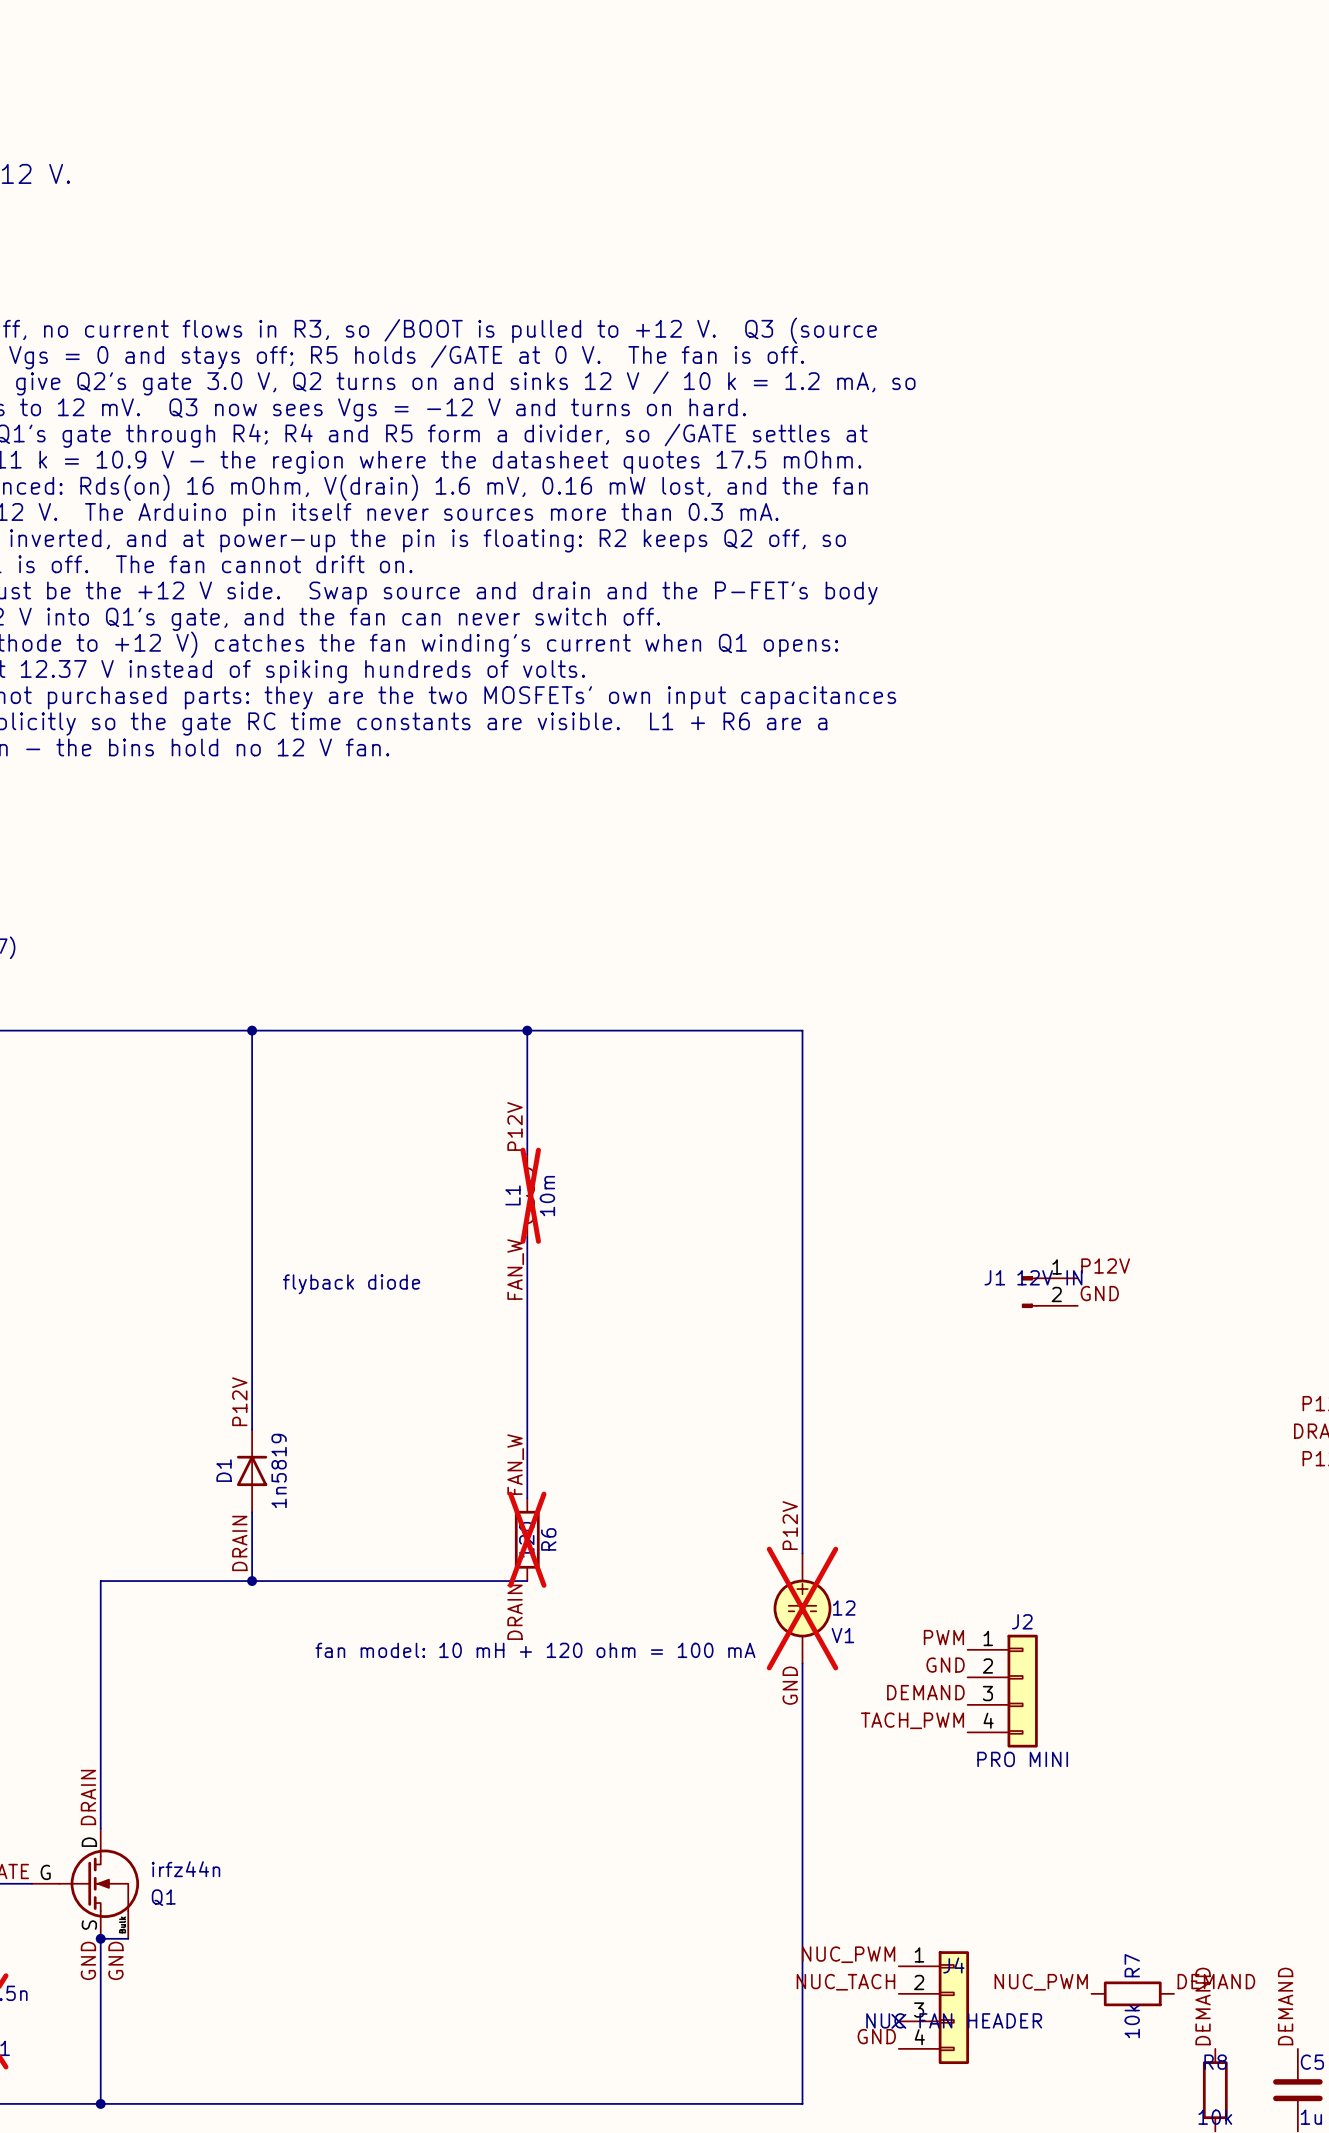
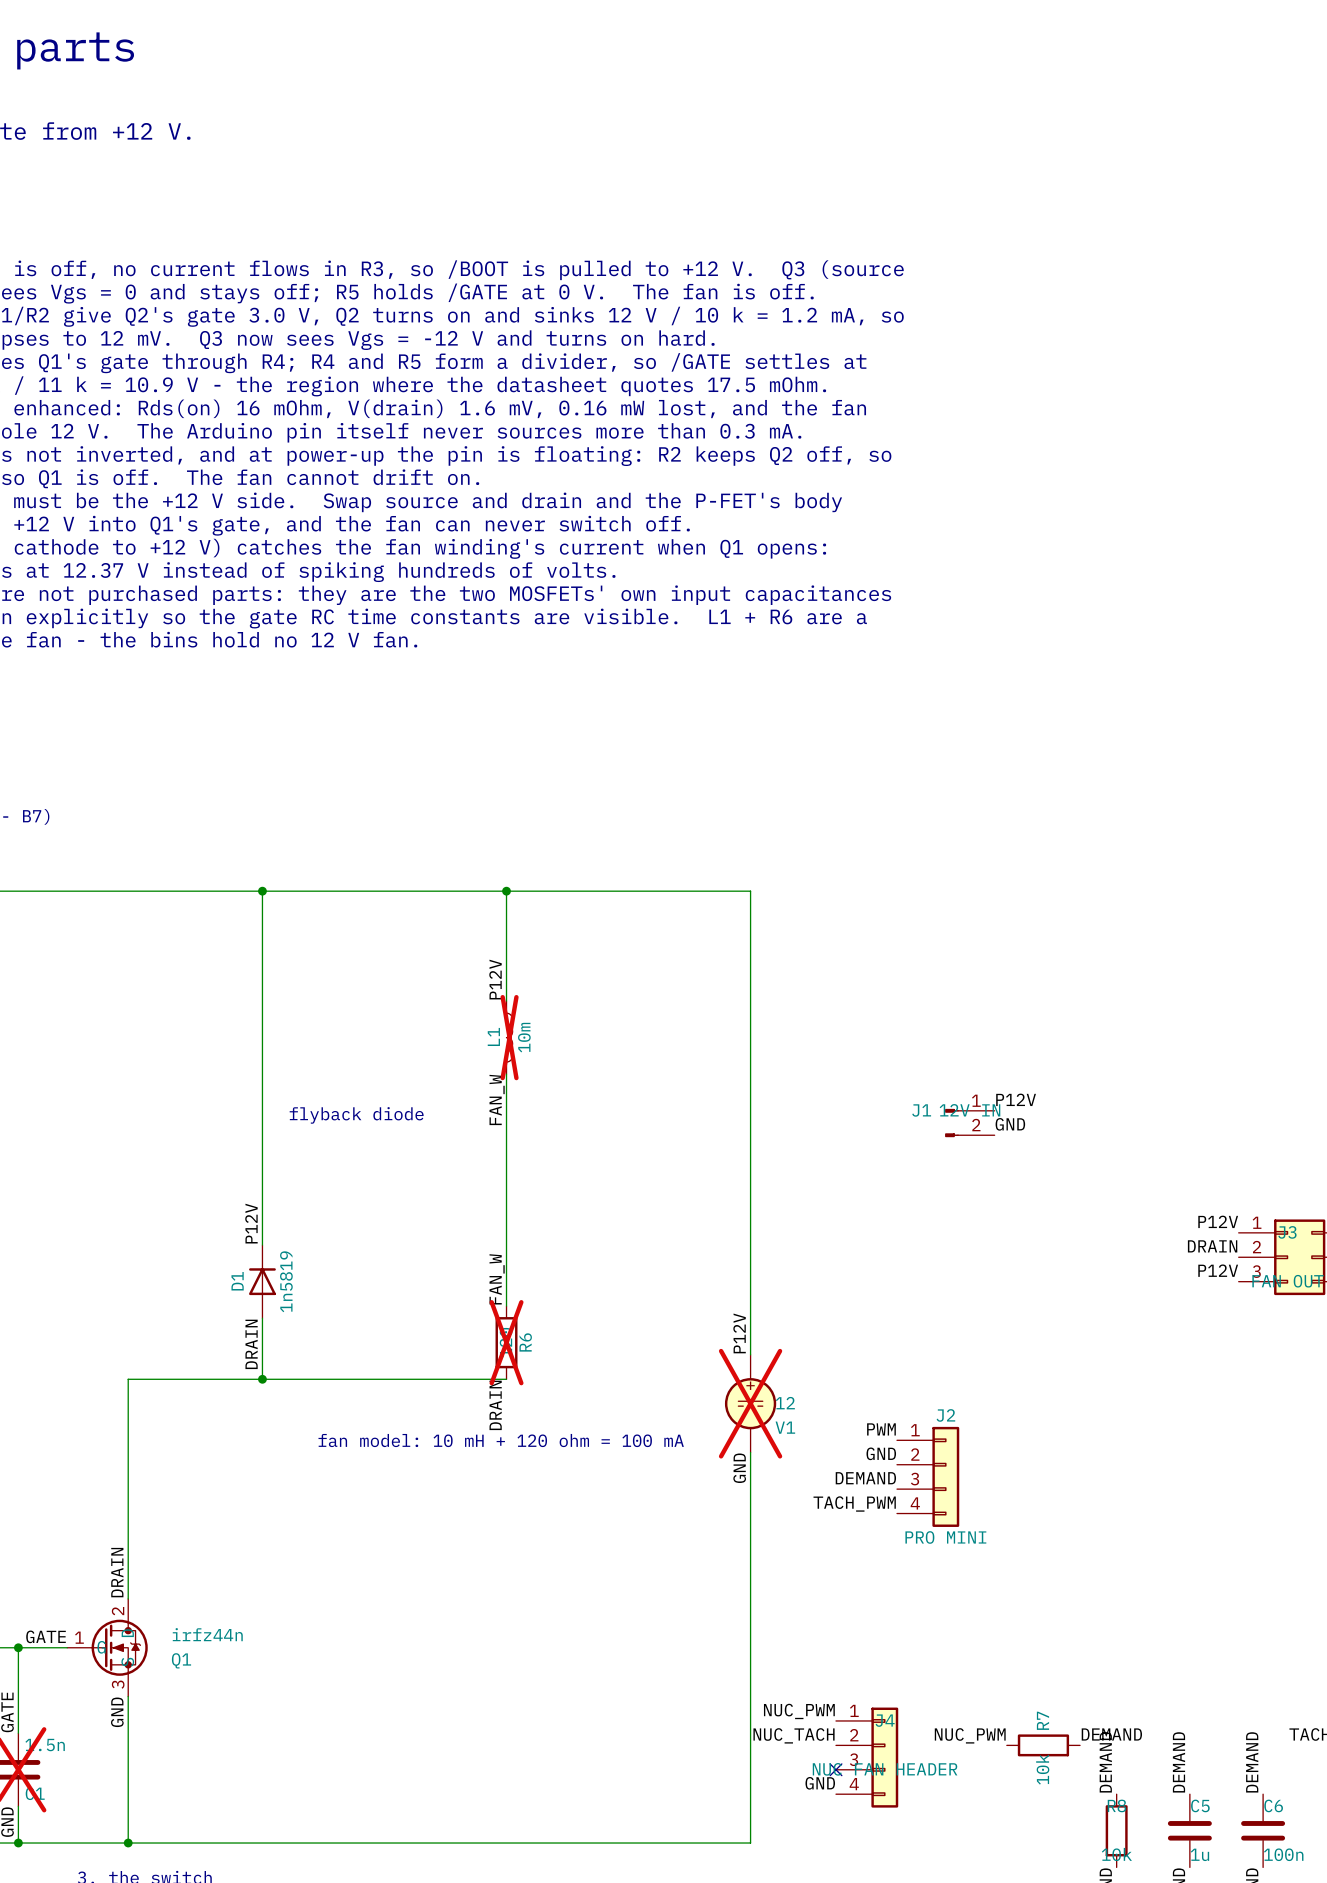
Q1 symbol: [31, 1828, 140, 1939] -> [67, 1598, 148, 1697]
wire: (100, 1938) (128, 1938) -> none
junction: (100, 1938) -> none
label: GND (115, 1960) -> none

